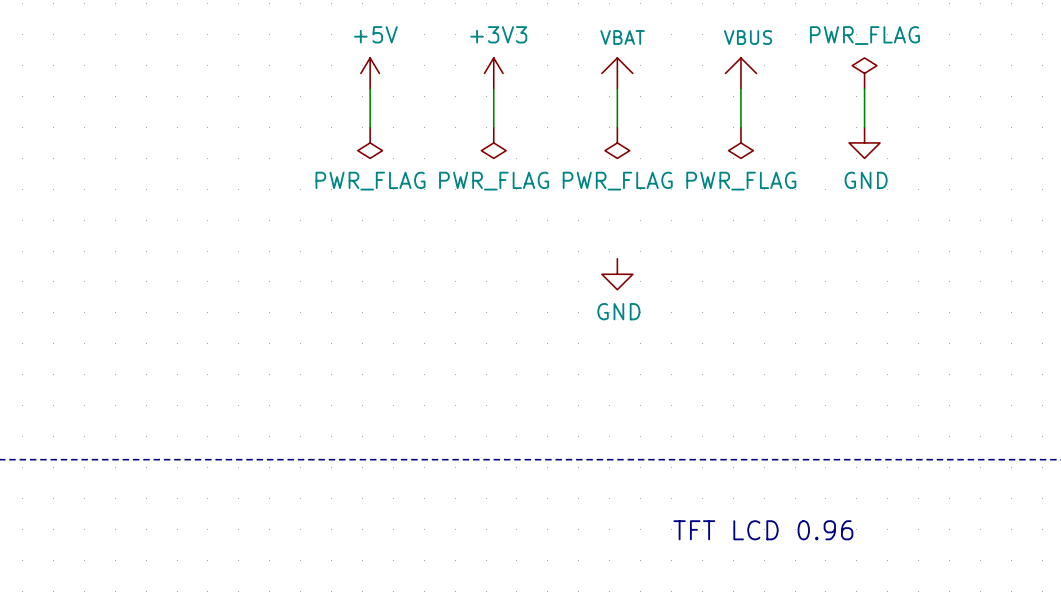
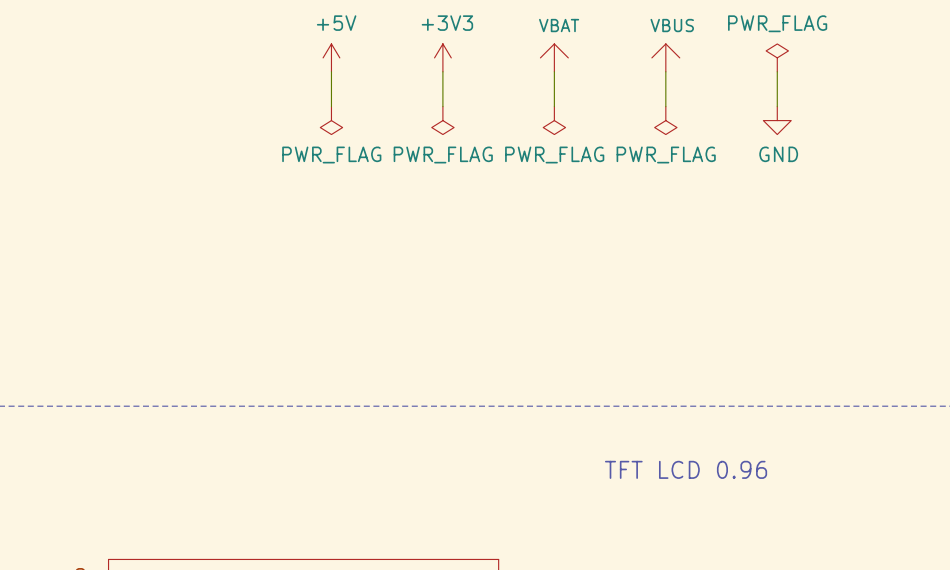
power symbol: GND (617, 274) -> none

